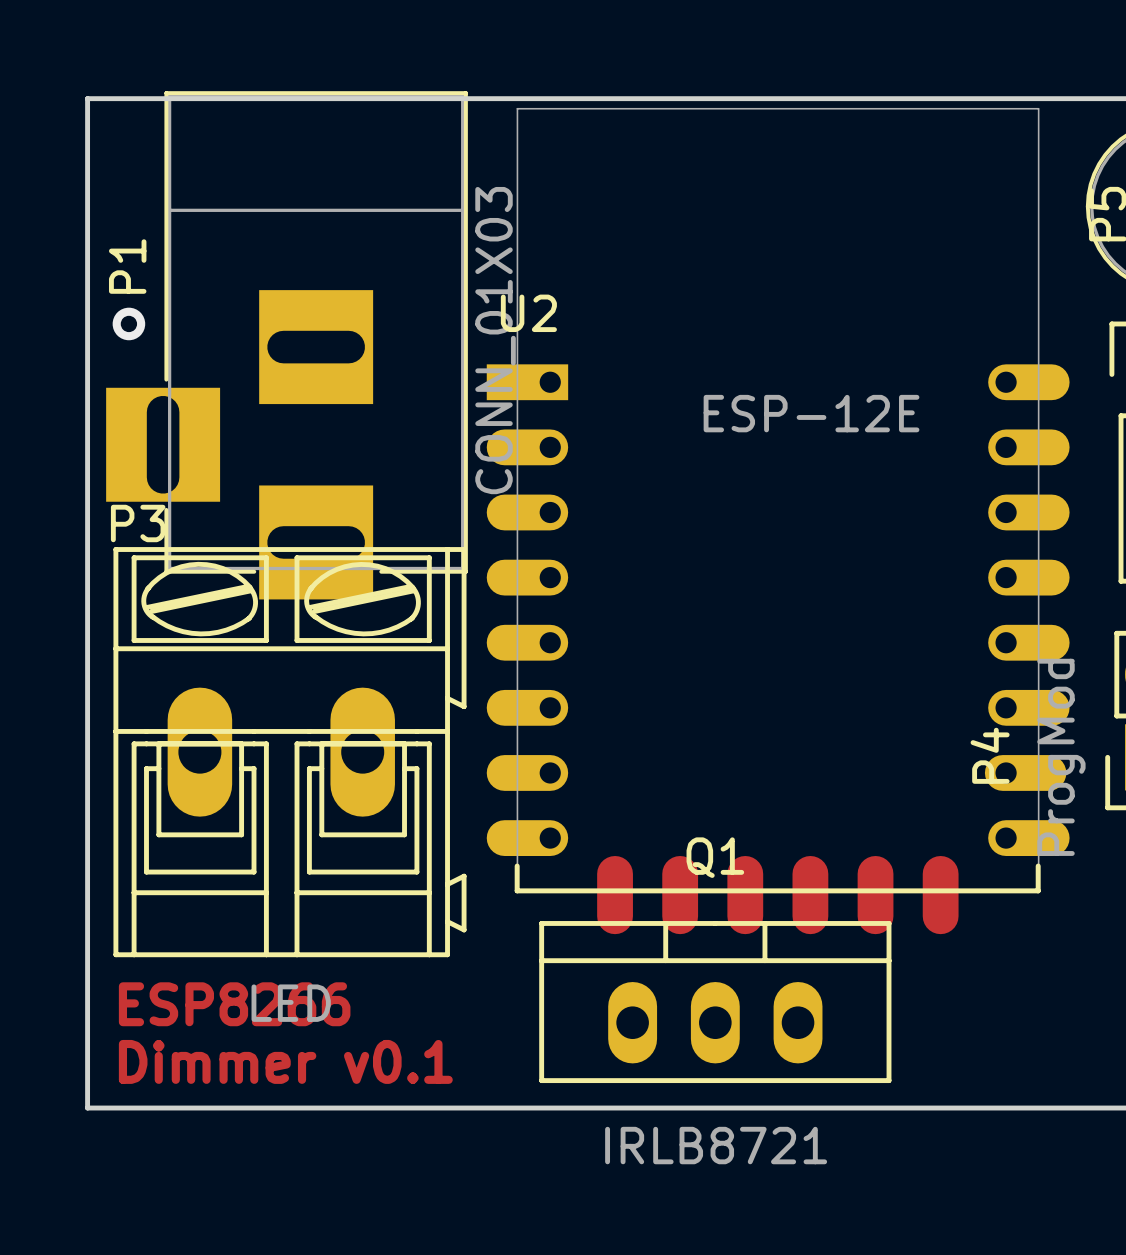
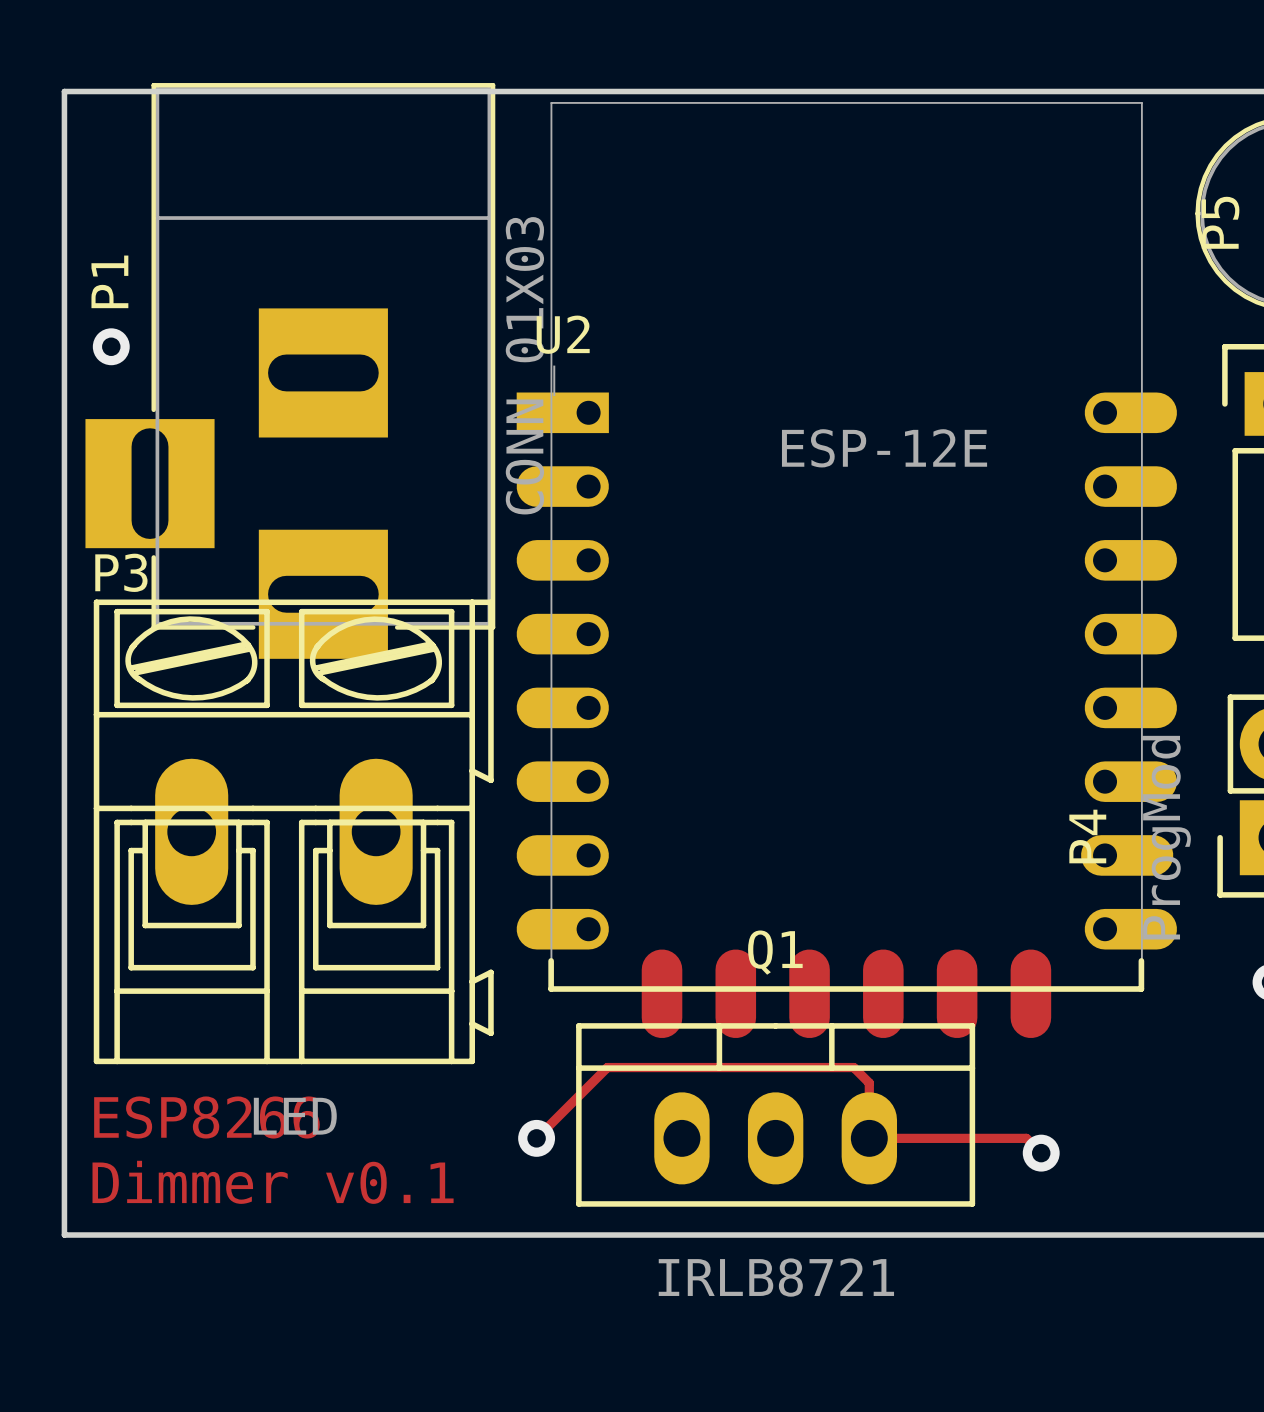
track: none -> (536, 1138) (607, 1067) (853, 1067) (869, 1083) (869, 1138) (1026, 1138) (1041, 1153)
via: none -> (536, 1138)
via: none -> (1041, 1153)

